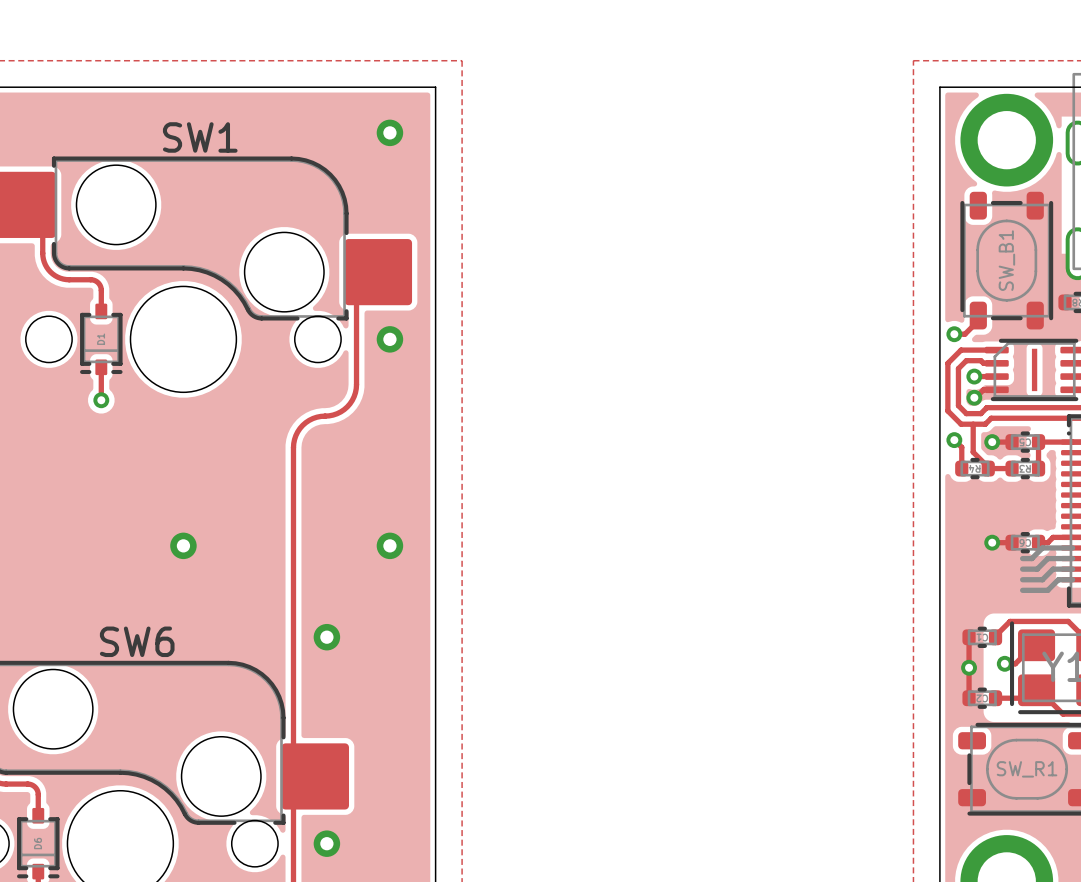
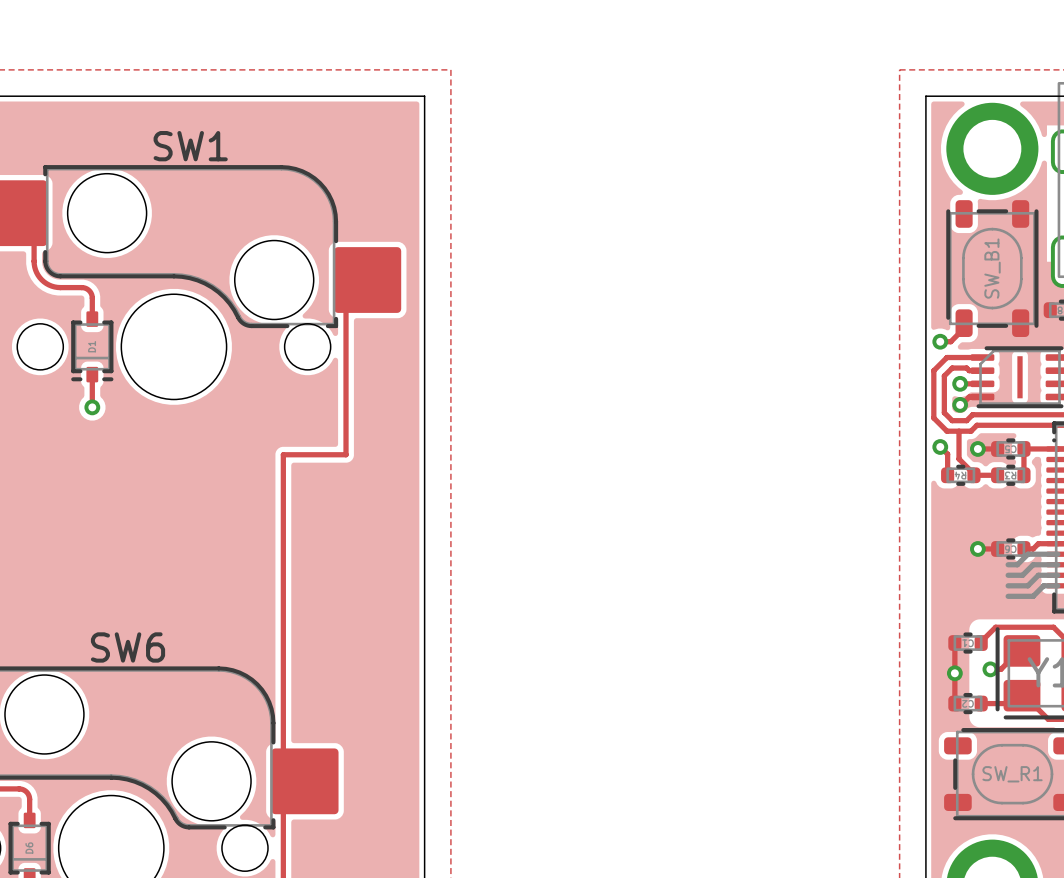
via: (389, 132) -> none
via: (389, 339) -> none
track: (356, 384) (352, 400) (344, 409) (333, 415) (312, 418) (302, 425) (295, 435) (293, 447) -> (346, 391) (346, 454) (283, 454)
via: (183, 545) -> none
via: (389, 545) -> none
via: (326, 637) -> none
via: (326, 843) -> none

